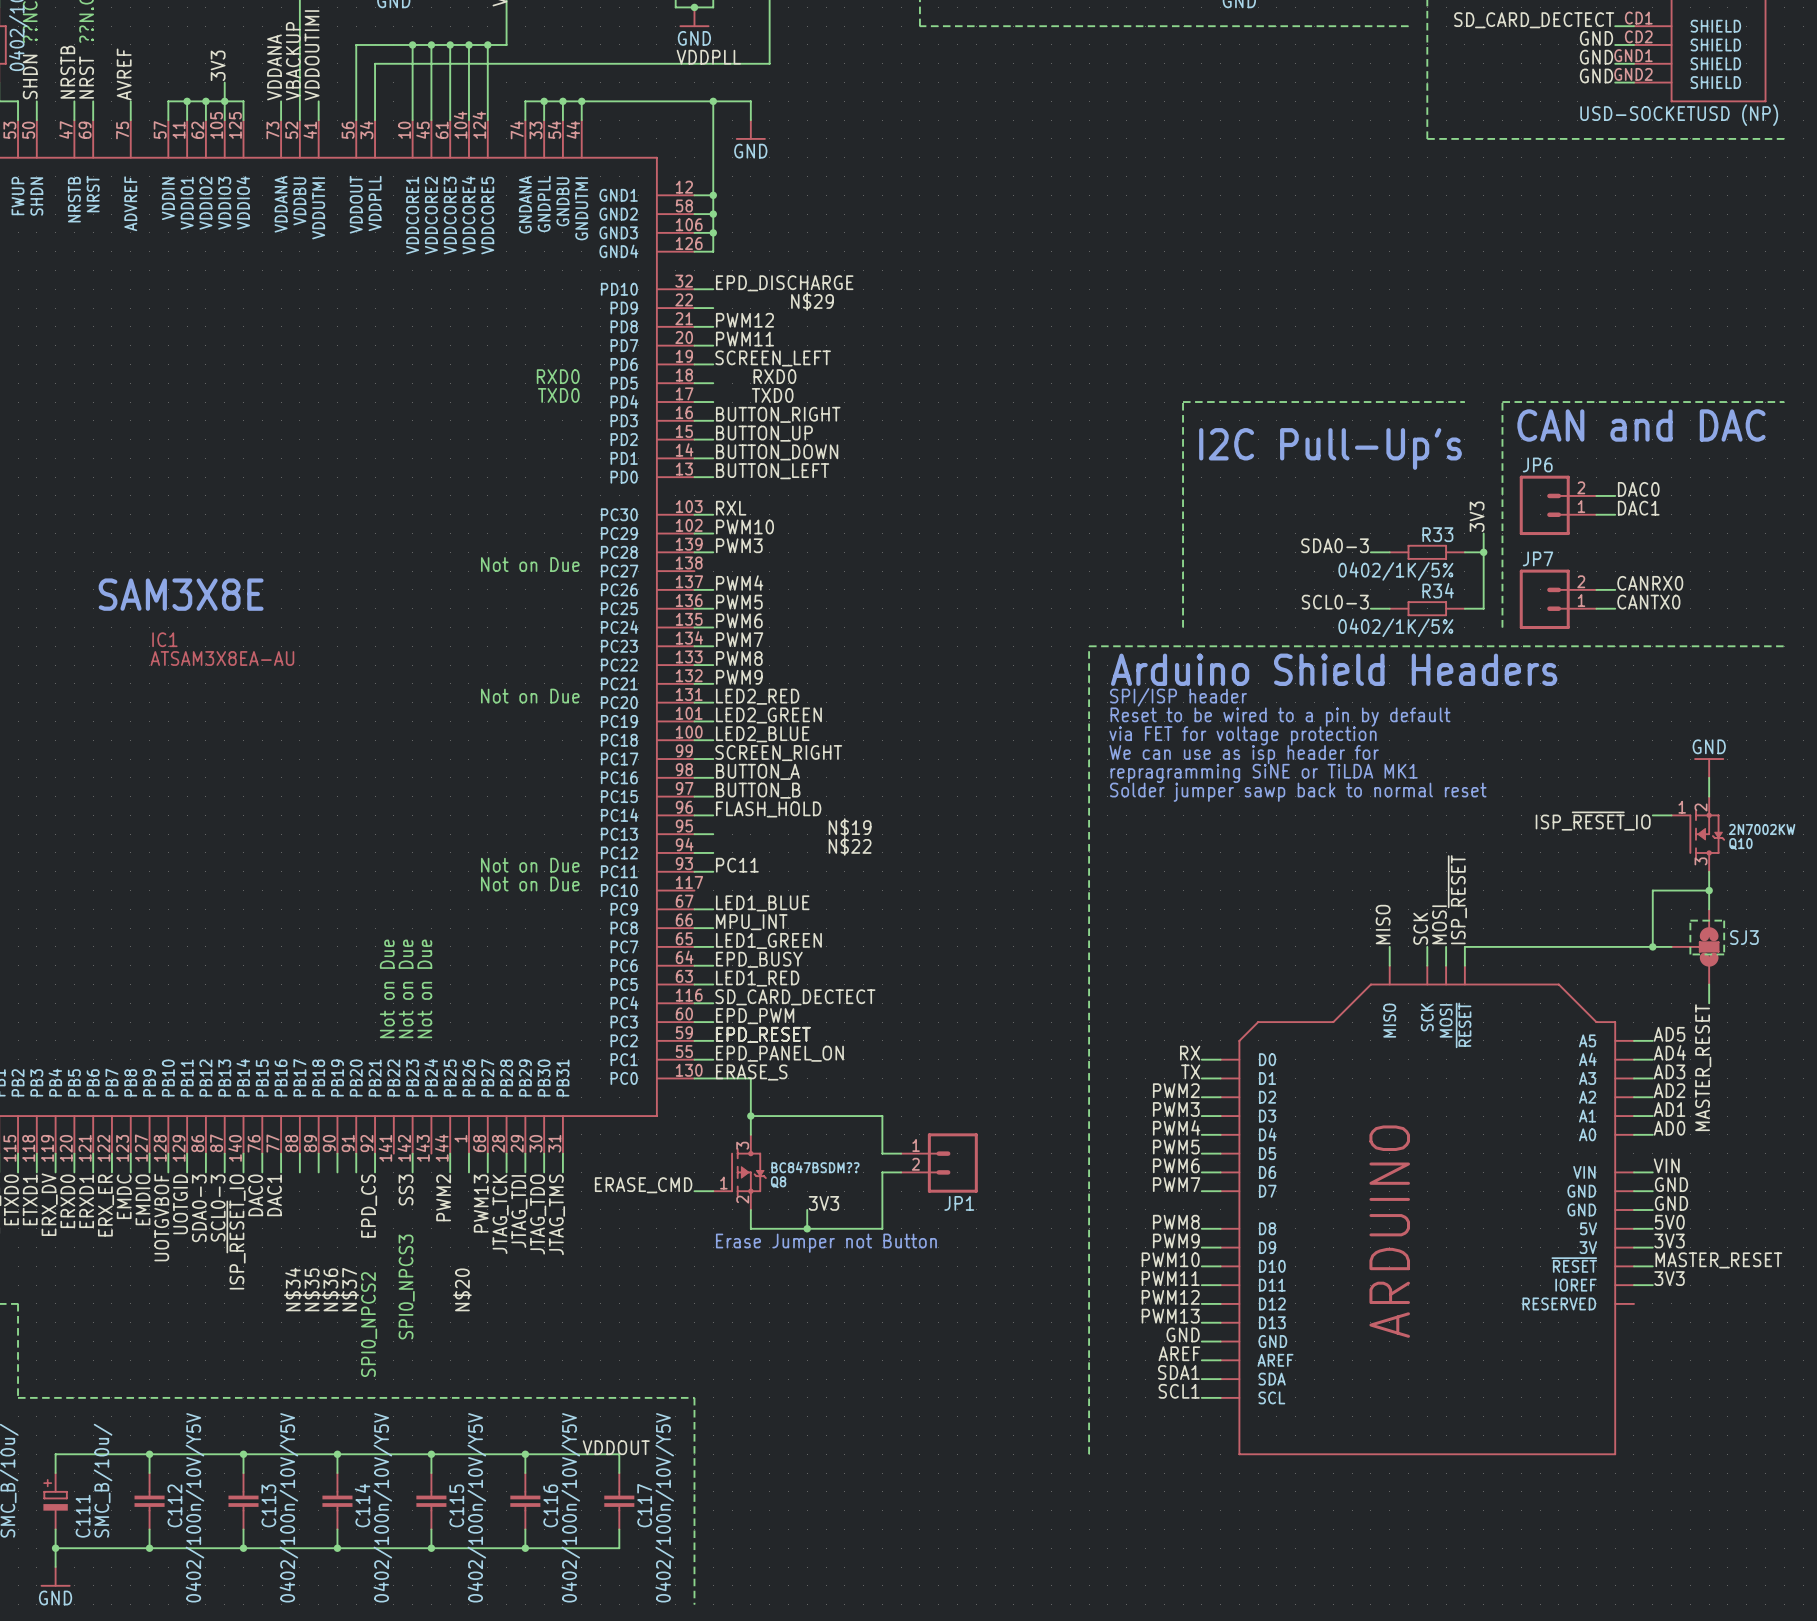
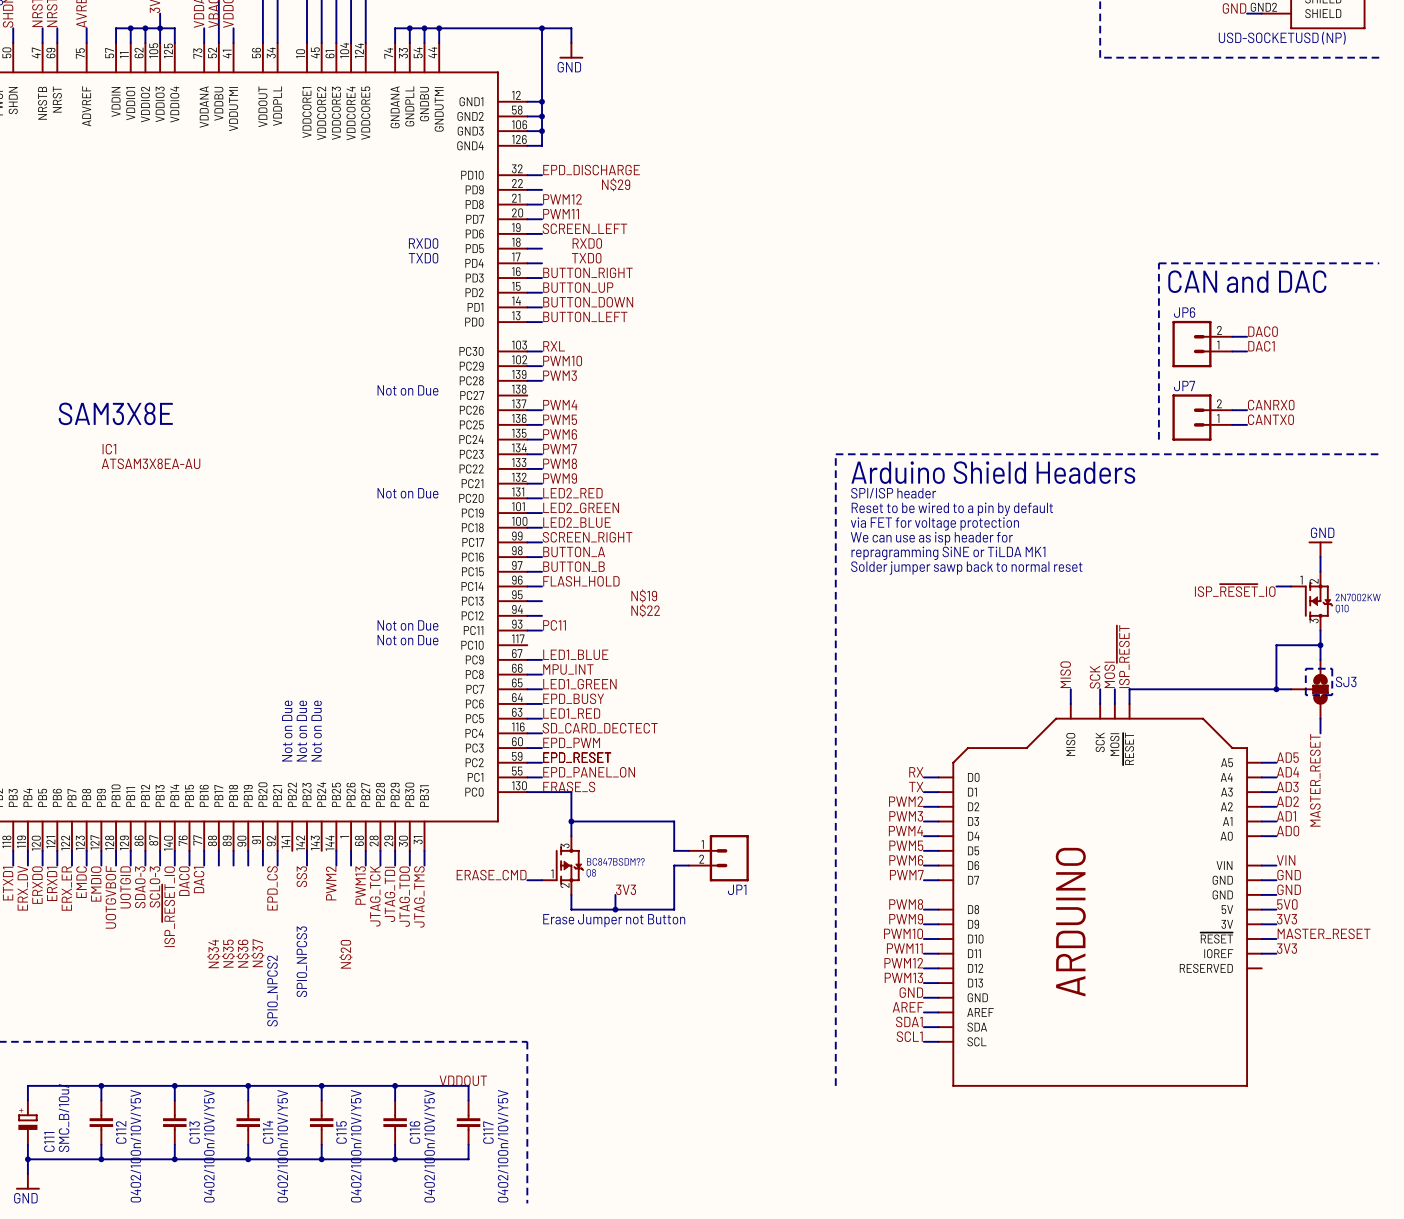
wire: (1464, 402) (1183, 402) (1183, 627) -> none
text: I2C Pull-Up's (1330, 448) -> none
label: 3V3 (1477, 516) -> none
wire: (1483, 533) (1483, 608) (1464, 608) -> none
label: SDA0-3 (1335, 545) -> none
wire: (1370, 552) (1389, 552) -> none
R33: 0402/1K/5% (1427, 552) -> none
wire: (1464, 552) (1483, 552) -> none
junction: (1483, 552) -> none
label: SCL0-3 (1335, 602) -> none
wire: (1370, 608) (1389, 608) -> none
R34: 0402/1K/5% (1427, 608) -> none

